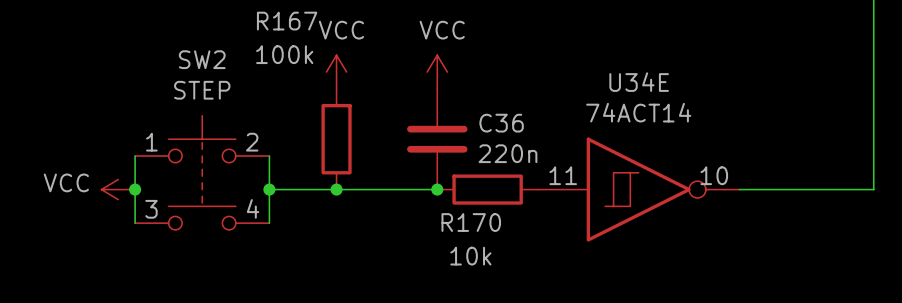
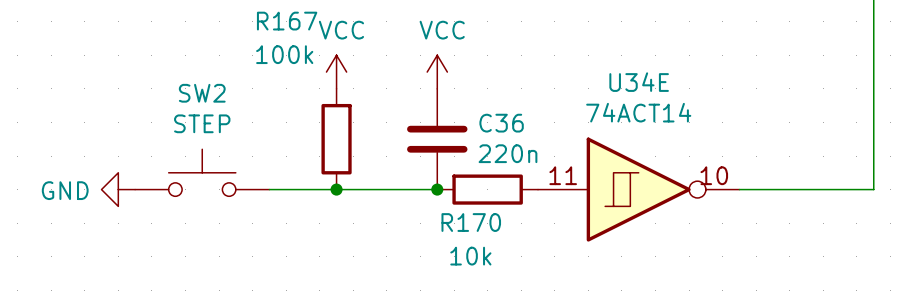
SW2 name position: SW2 (202, 59) -> SW2 (202, 93)
SW2 value position: STEP (202, 90) -> STEP (202, 123)
SW2 symbol: [135, 115, 270, 230] -> [135, 149, 270, 197]
wire: (135, 156) (135, 223) -> none
wire: (269, 156) (269, 223) -> none
power symbol: VCC (118, 189) -> GND (118, 189)
junction: (135, 189) -> none
junction: (269, 189) -> none

